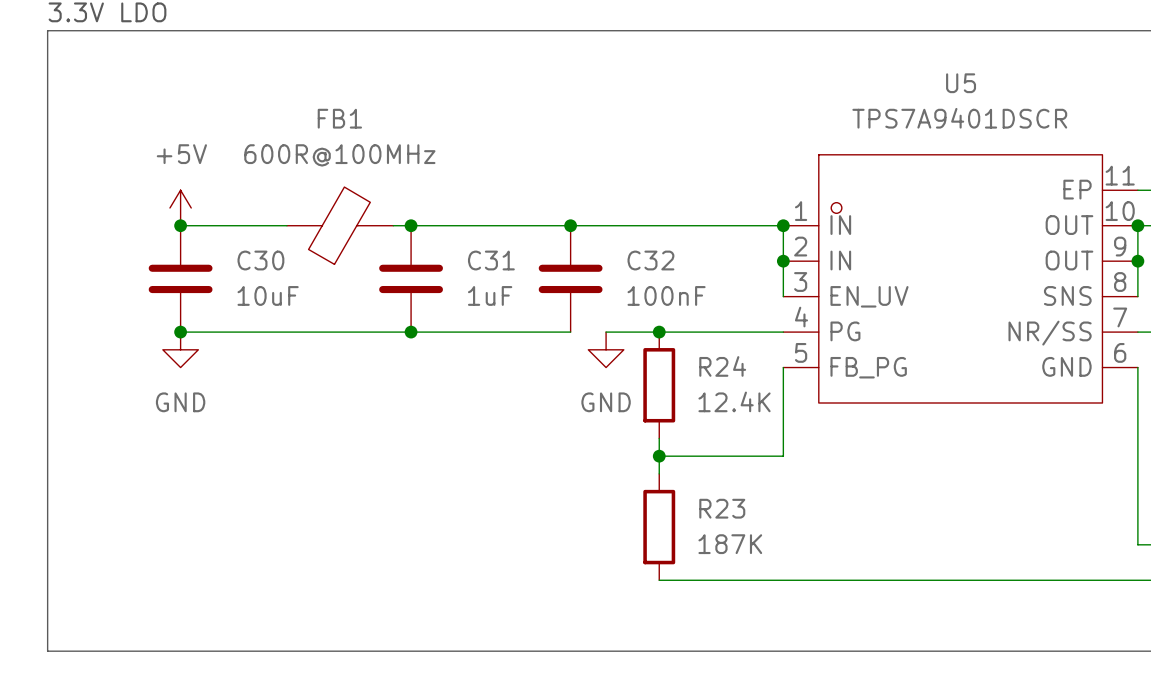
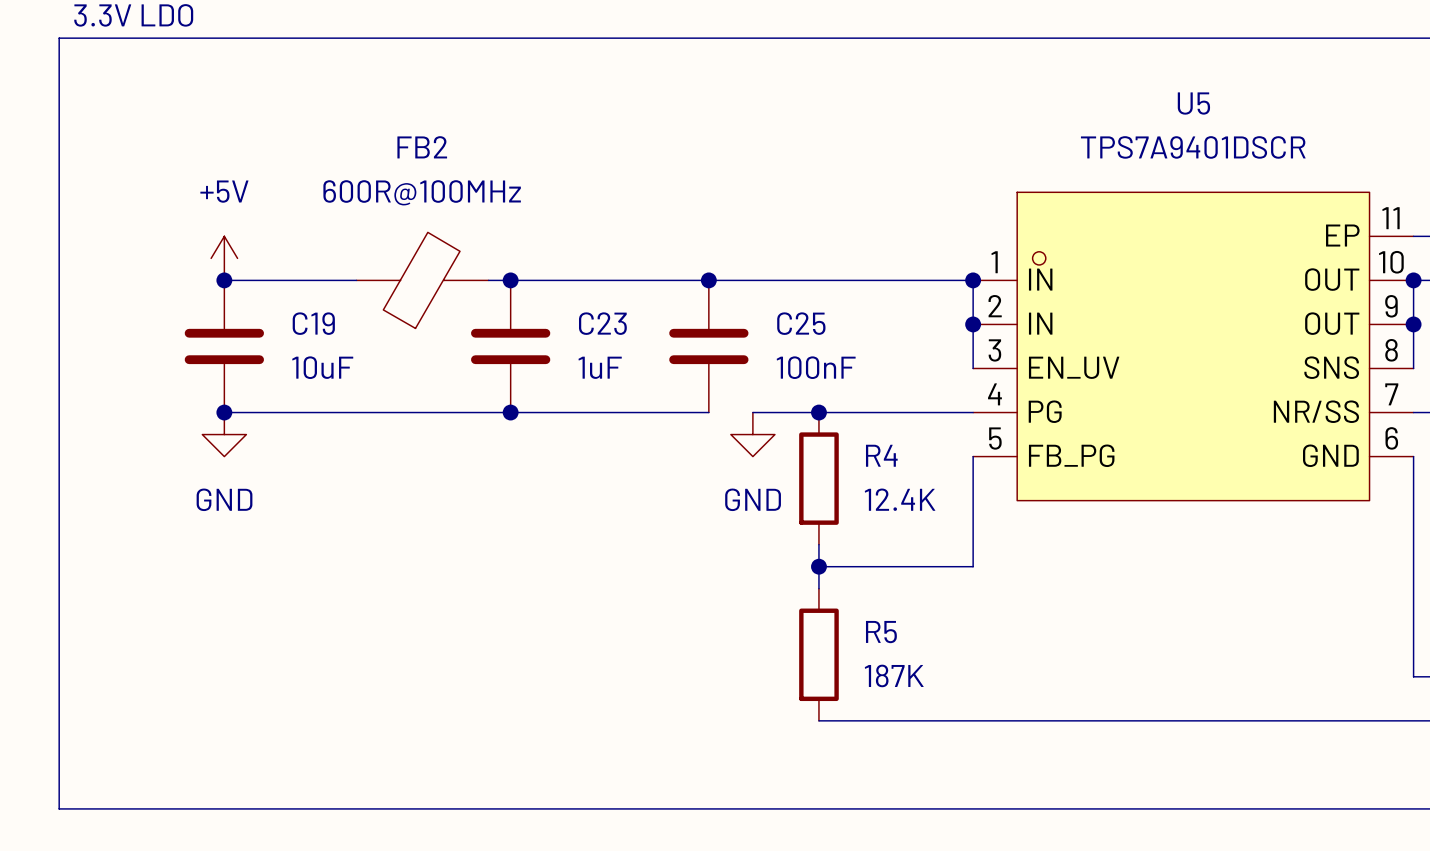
FB1 name: FB1 (339, 118) -> FB2 (422, 147)
C30 name: C30 (260, 260) -> C19 (313, 323)
C31 name: C31 (491, 260) -> C23 (602, 323)
C32 name: C32 (650, 260) -> C25 (801, 323)
R24 name: R24 (722, 366) -> R4 (881, 455)
R23 name: R23 (722, 508) -> R5 (881, 632)

